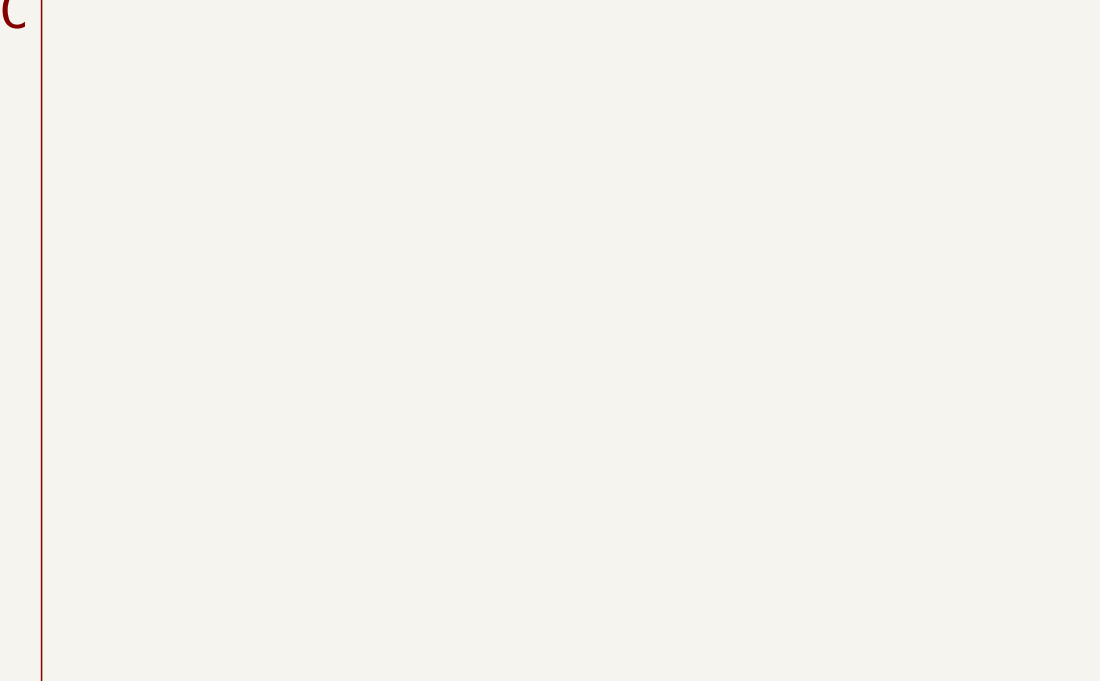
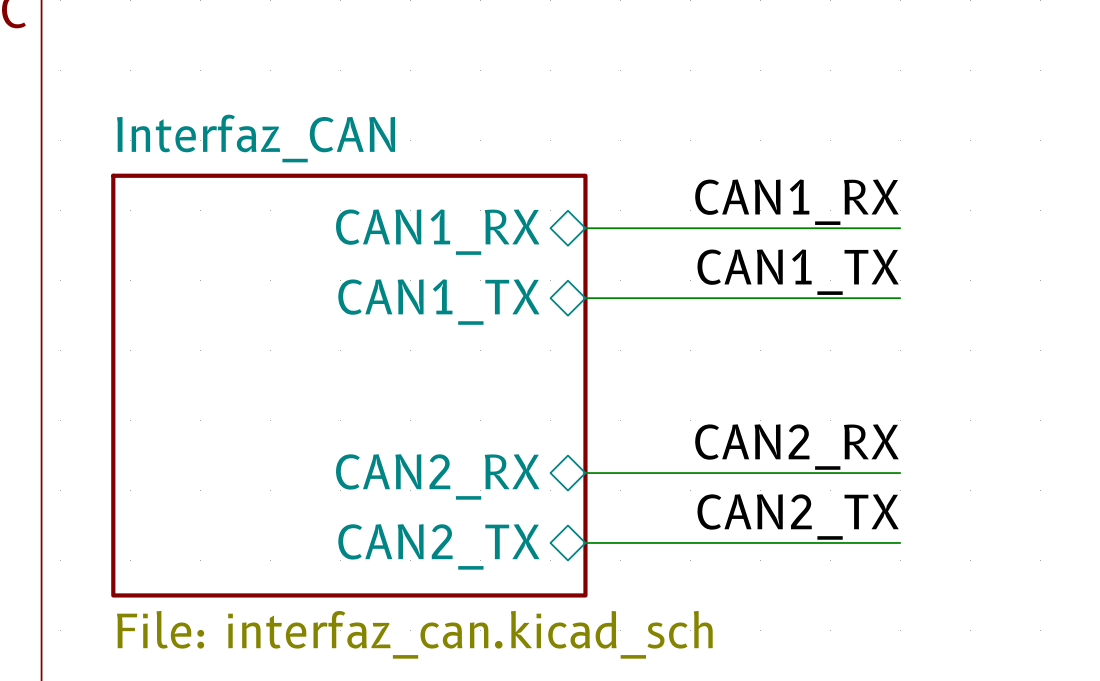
label: none -> CAN1_RX (796, 202)
wire: none -> (585, 228) (900, 228)
sheet pin: none -> CAN1_RX (437, 232)
label: none -> CAN1_TX (798, 272)
wire: none -> (585, 298) (900, 298)
sheet pin: none -> CAN1_TX (438, 302)
sheet Interfaz_CAN: none -> File: interfaz_can.kicad_sch (349, 385)
label: none -> CAN2_RX (796, 447)
wire: none -> (585, 473) (900, 473)
sheet pin: none -> CAN2_RX (437, 476)
label: none -> CAN2_TX (798, 517)
wire: none -> (585, 542) (900, 542)
sheet pin: none -> CAN2_TX (438, 546)

